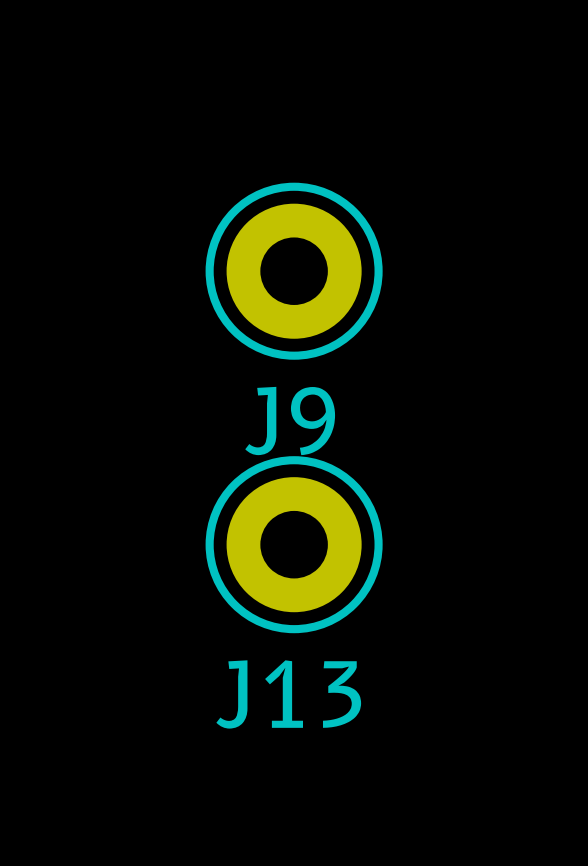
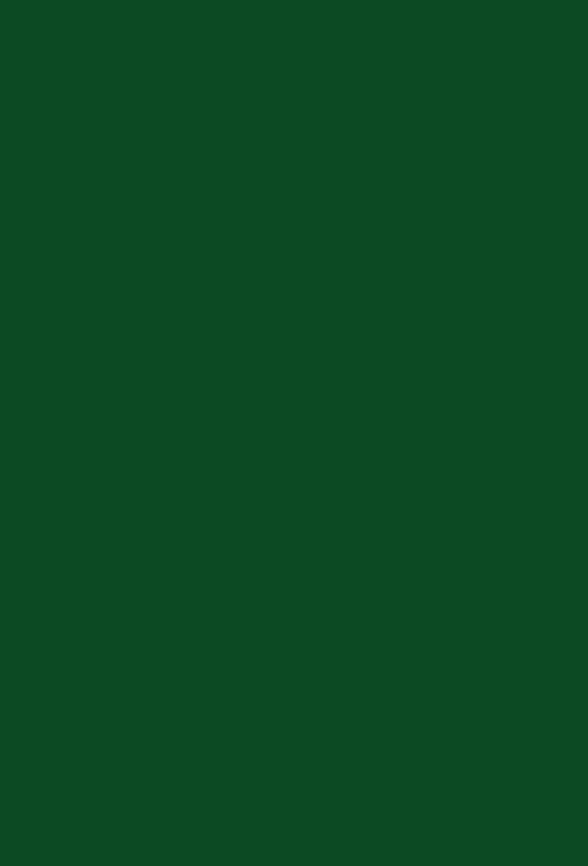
J9: (294, 271) -> none
J13: (294, 544) -> none

